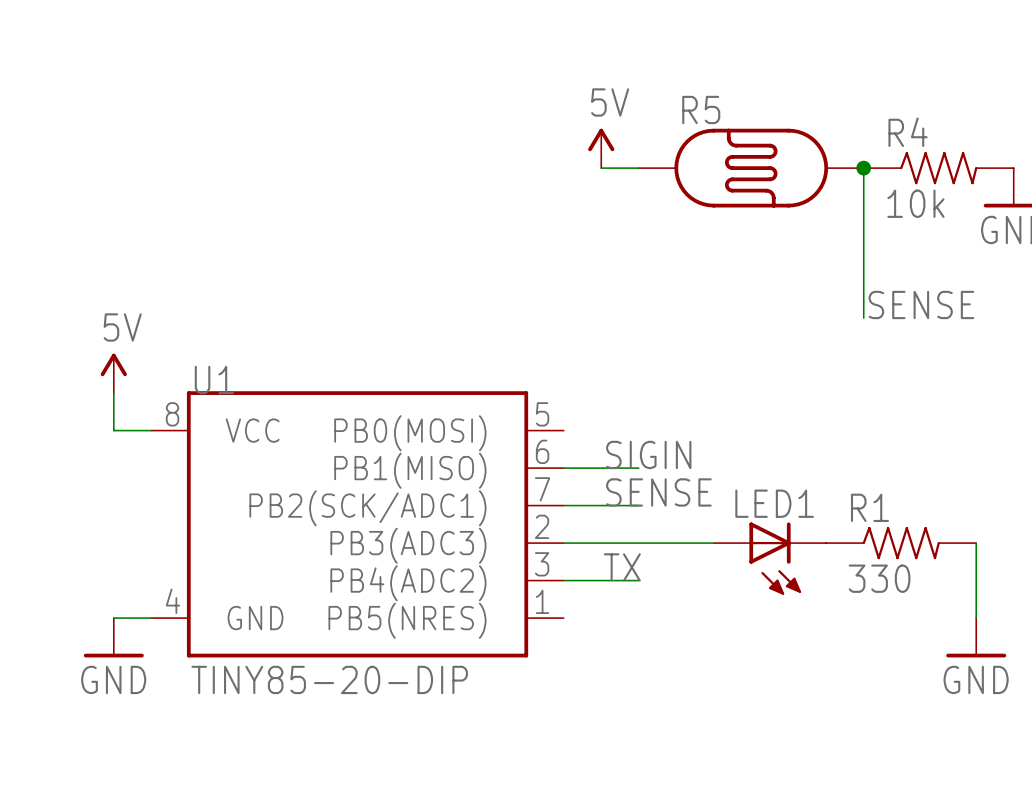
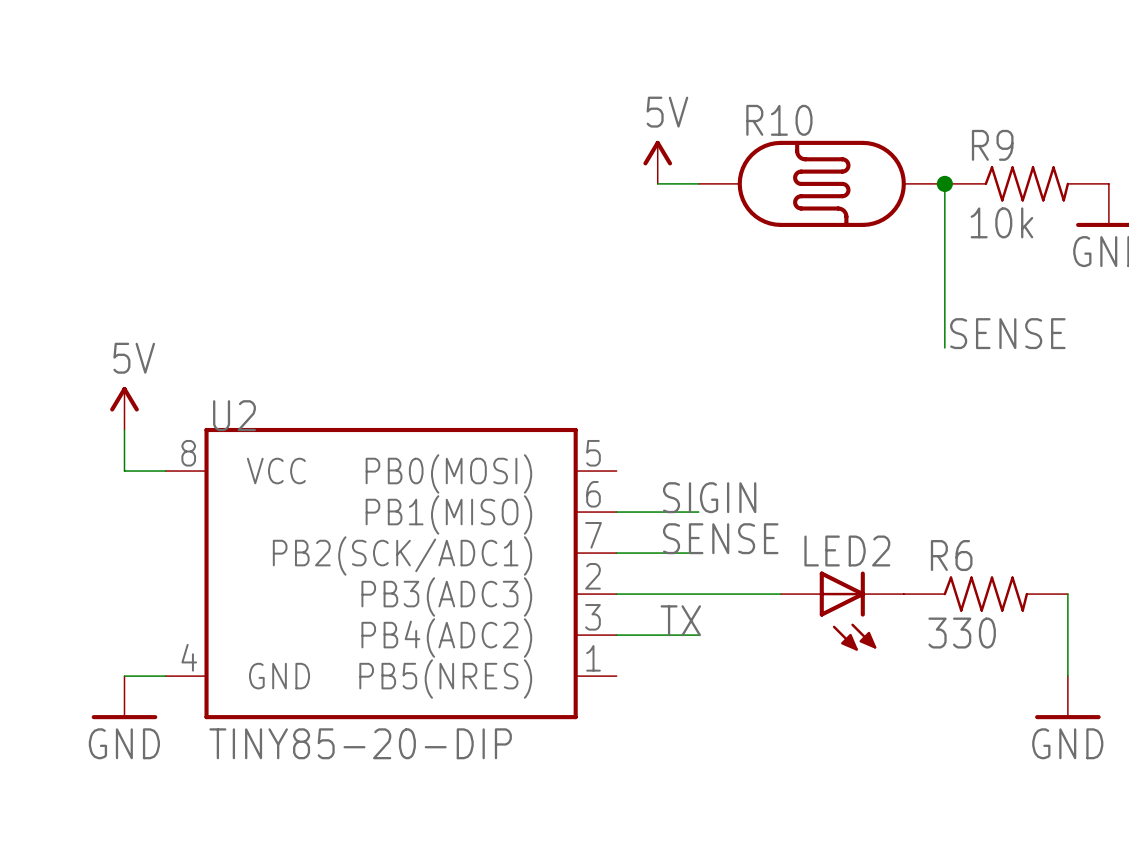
R5 name: R5 (701, 110) -> R10 (779, 120)
R4 name: R4 (908, 132) -> R9 (992, 145)
U1 name: U1 (214, 379) -> U2 (234, 415)
LED1 name: LED1 (774, 503) -> LED2 (847, 551)
R1 name: R1 (869, 507) -> R6 (951, 555)

